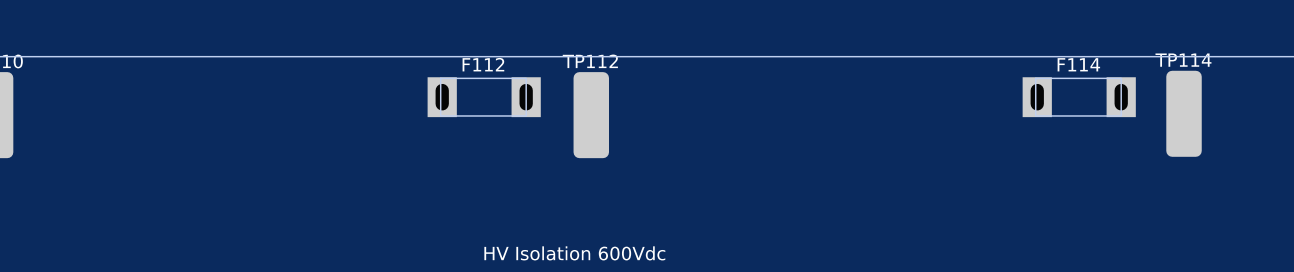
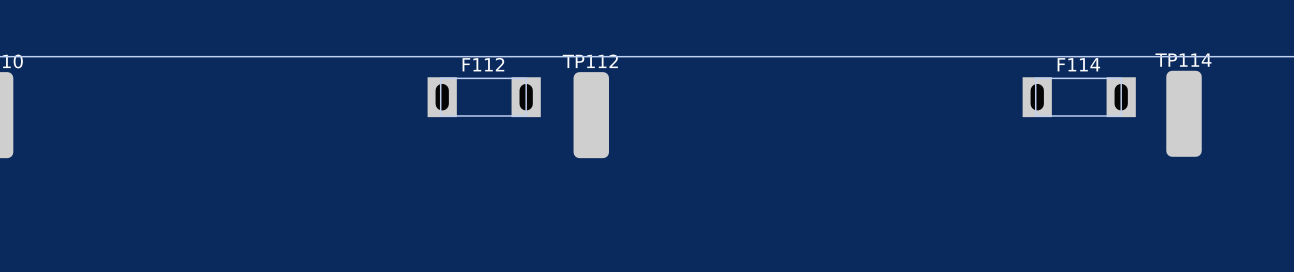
text: HV Isolation 600Vdc (574, 253) -> none

